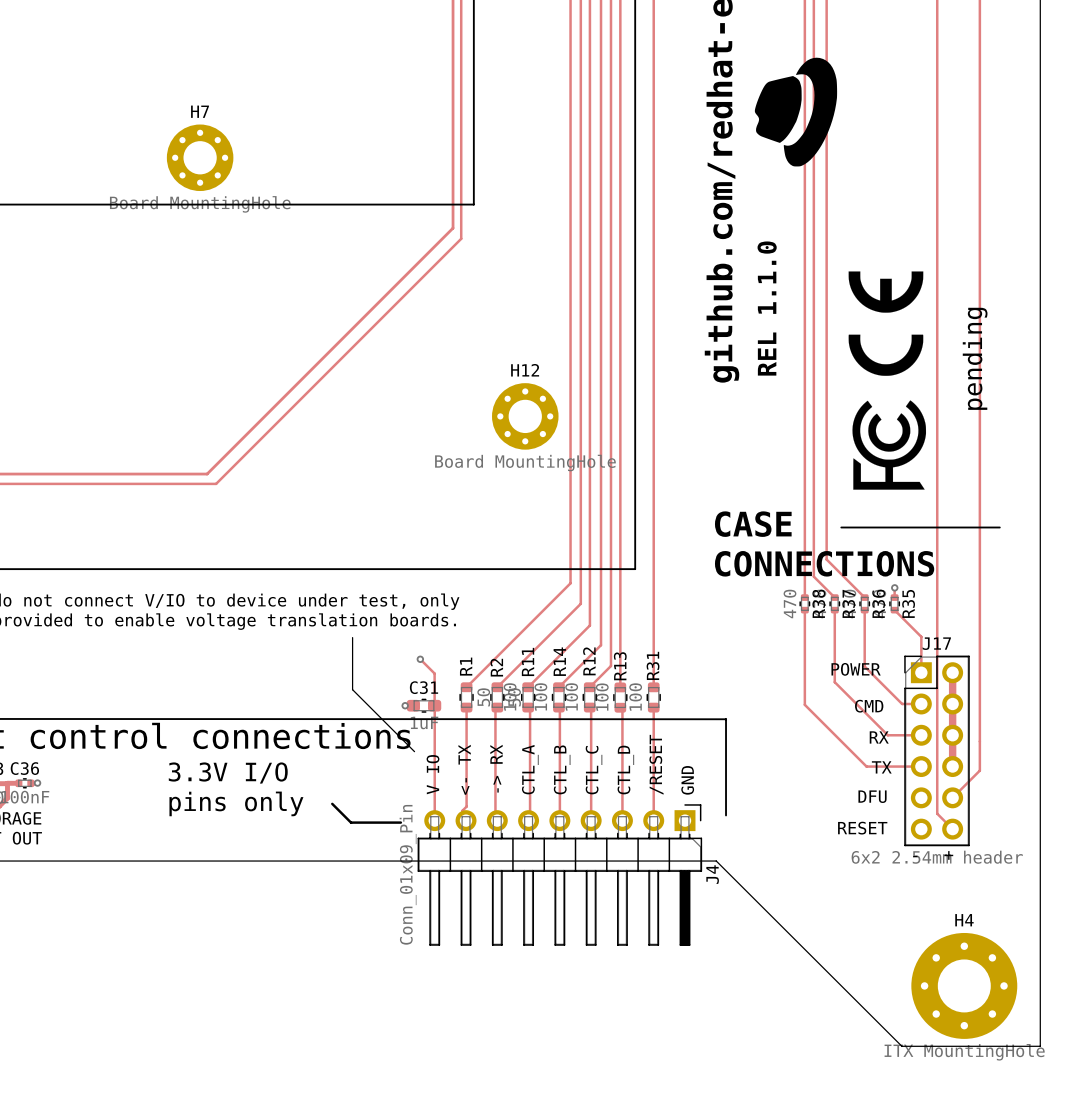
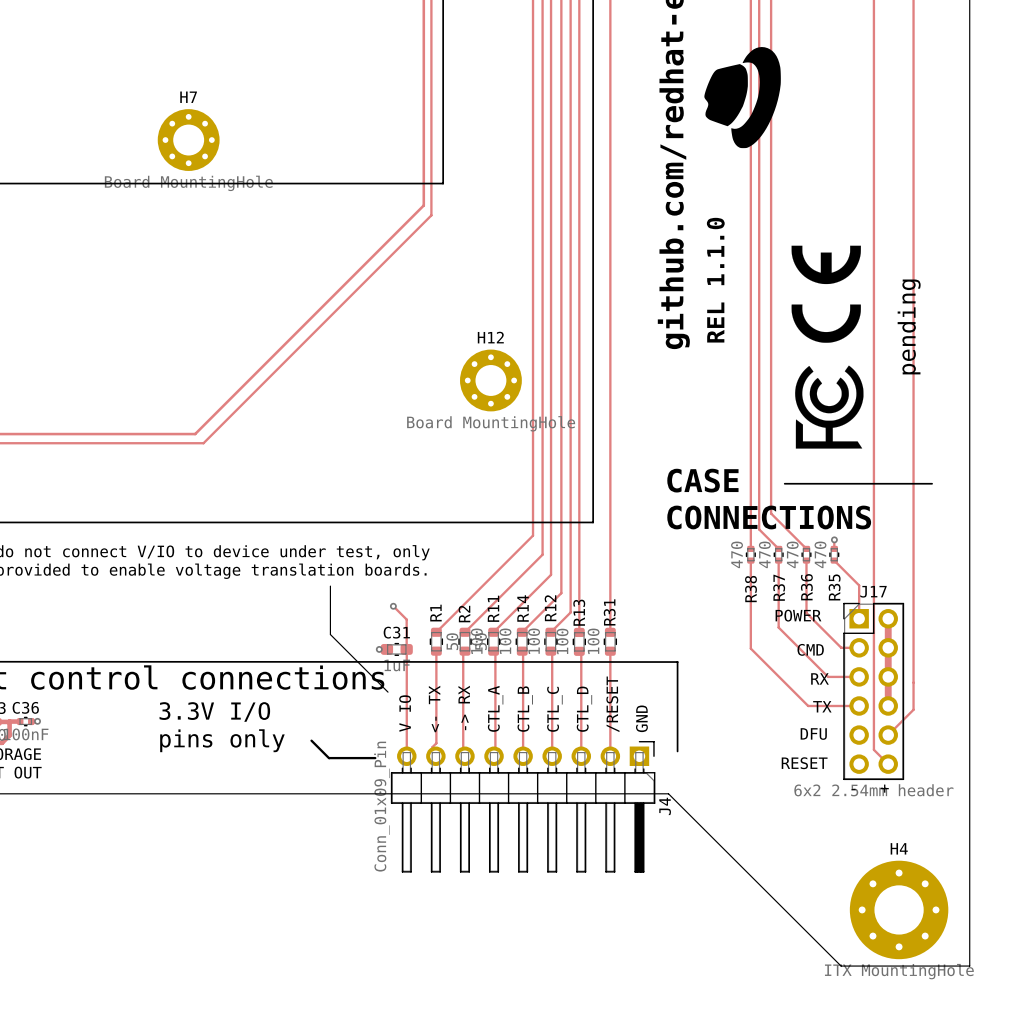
R38 name position: R38 (818, 603) -> R38 (750, 589)
R37 name position: R37 (848, 603) -> R37 (779, 587)
R36 name position: R36 (878, 603) -> R36 (806, 587)
R35 name position: R35 (908, 603) -> R35 (834, 587)

